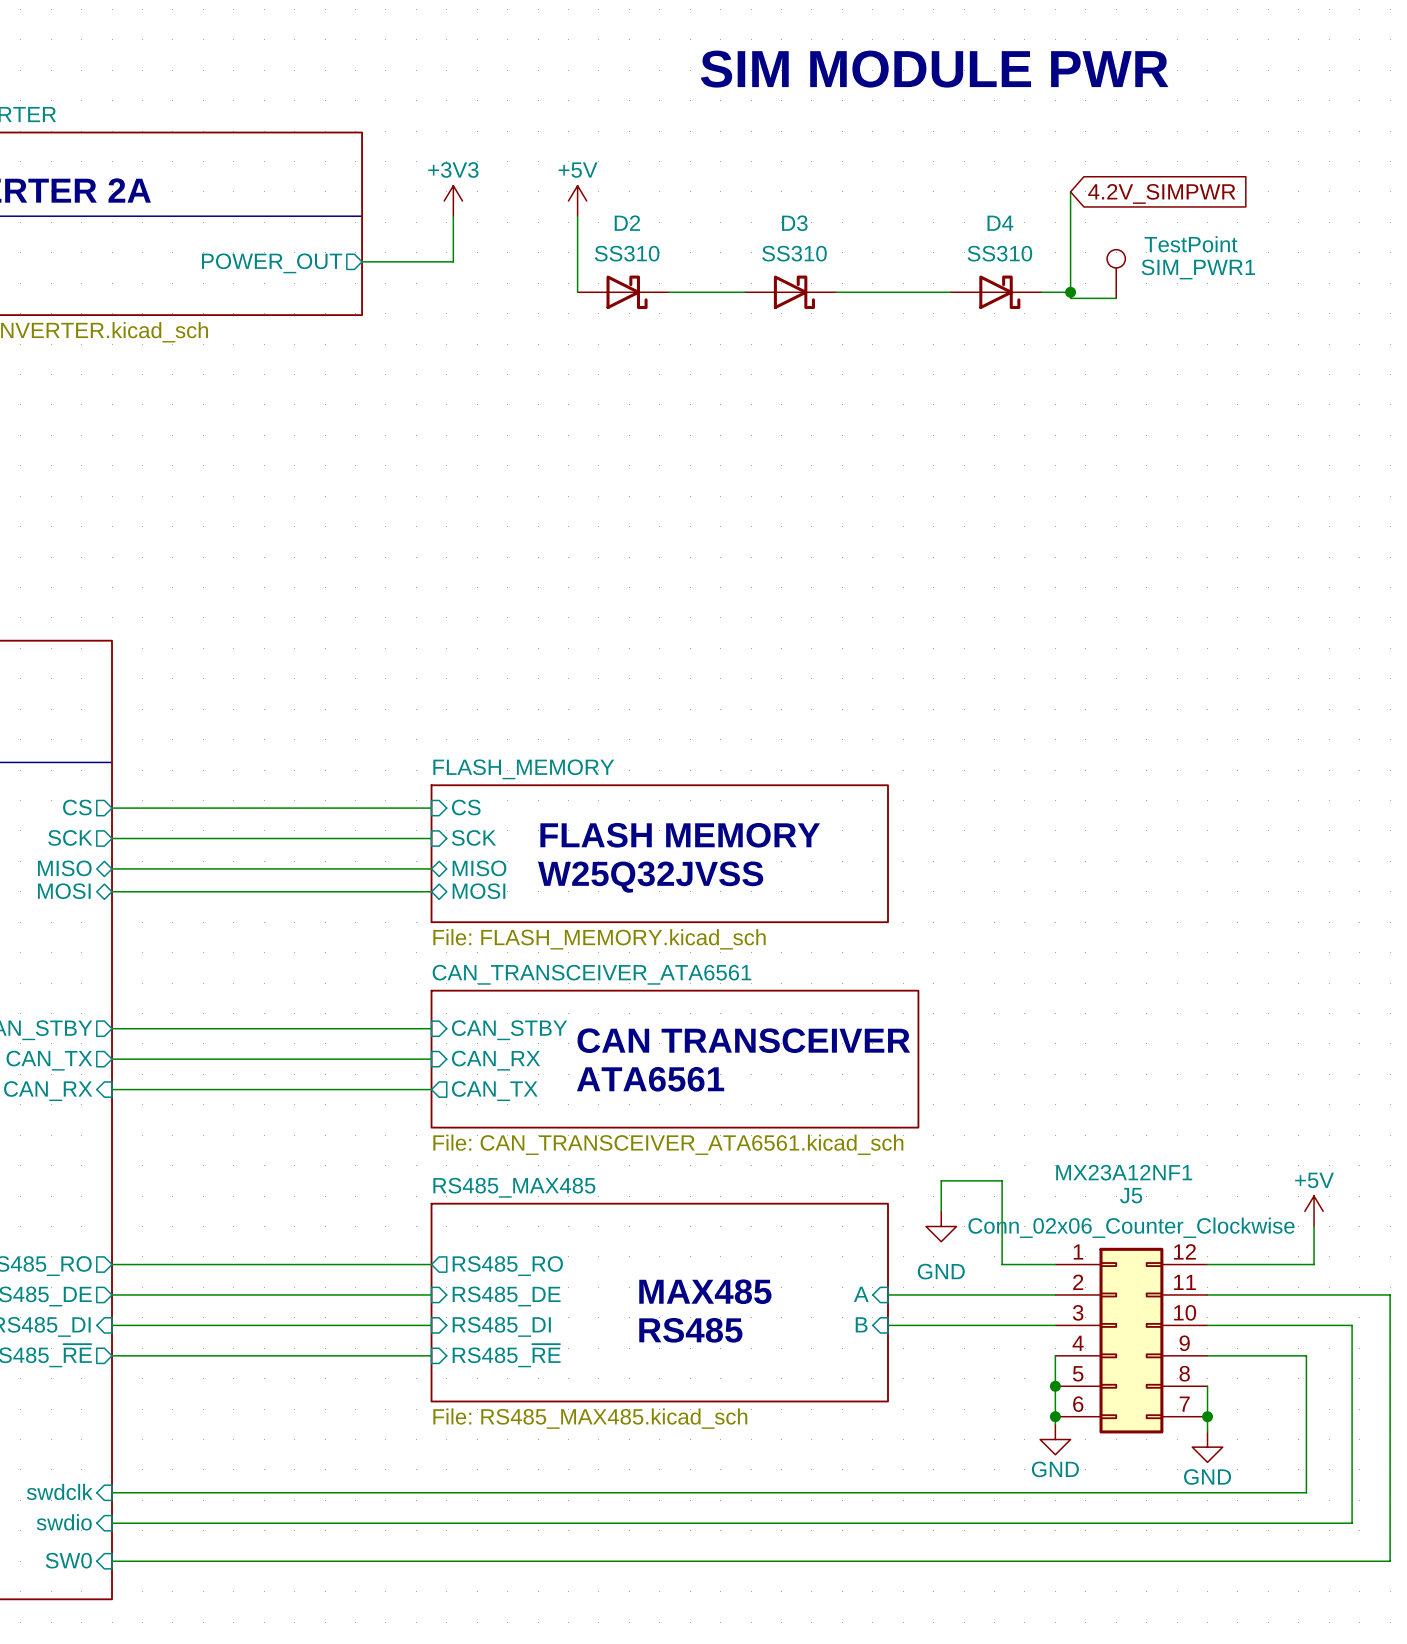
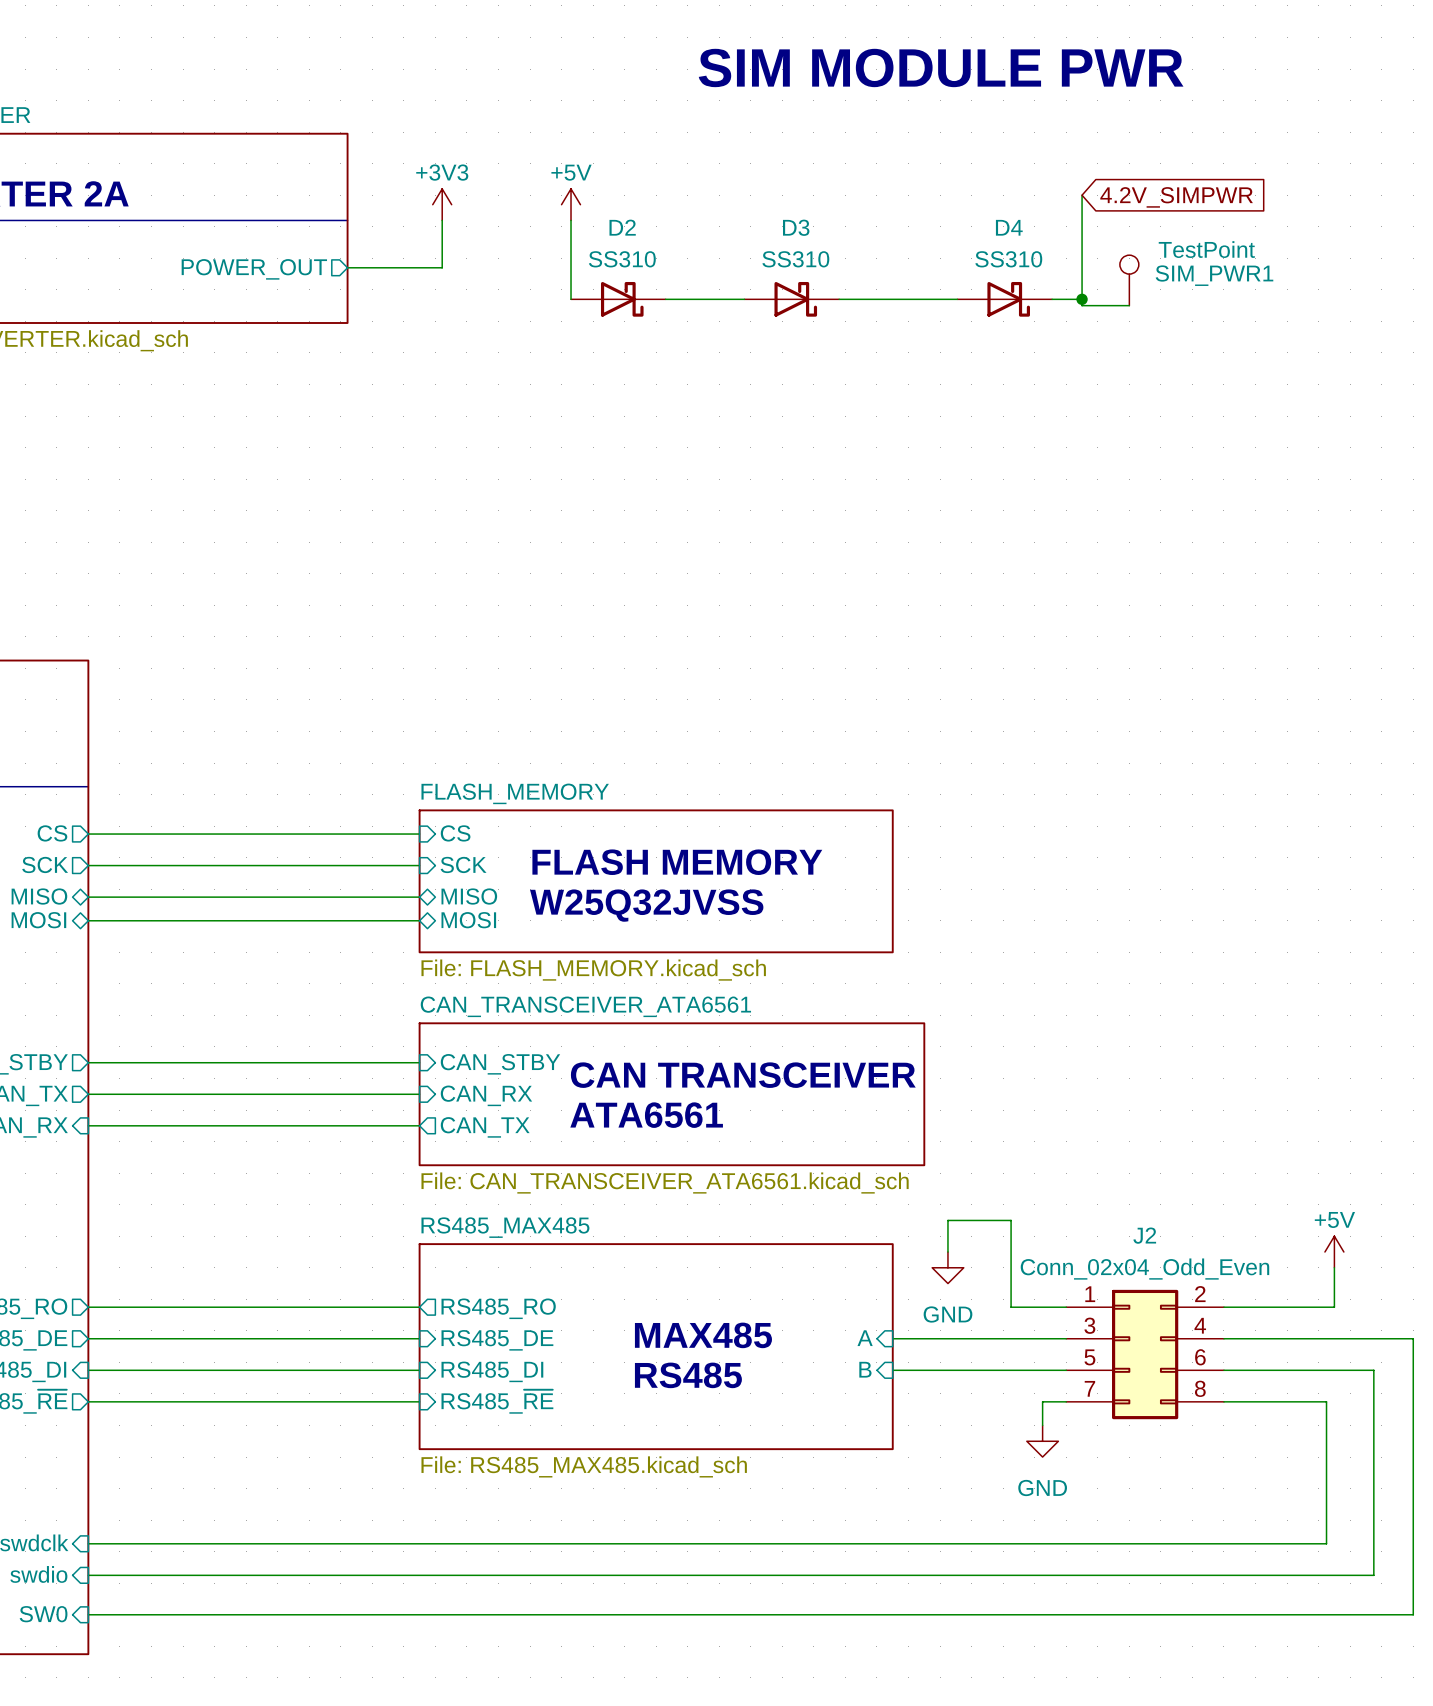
J2: none -> Conn_02x04_Odd_Even (1145, 1354)
J5: Conn_02x06_Counter_Clockwise (1131, 1340) -> none
wire: (1055, 1355) (1055, 1424) -> (1066, 1401) (1042, 1401) (1042, 1425)
junction: (1055, 1386) -> none
wire: (1207, 1386) (1207, 1431) -> none
junction: (1055, 1416) -> none
junction: (1207, 1416) -> none
power symbol position: GND (1055, 1439) -> GND (1042, 1441)
power symbol: GND (1207, 1447) -> none
power symbol text position: GND (1055, 1469) -> GND (1042, 1488)

